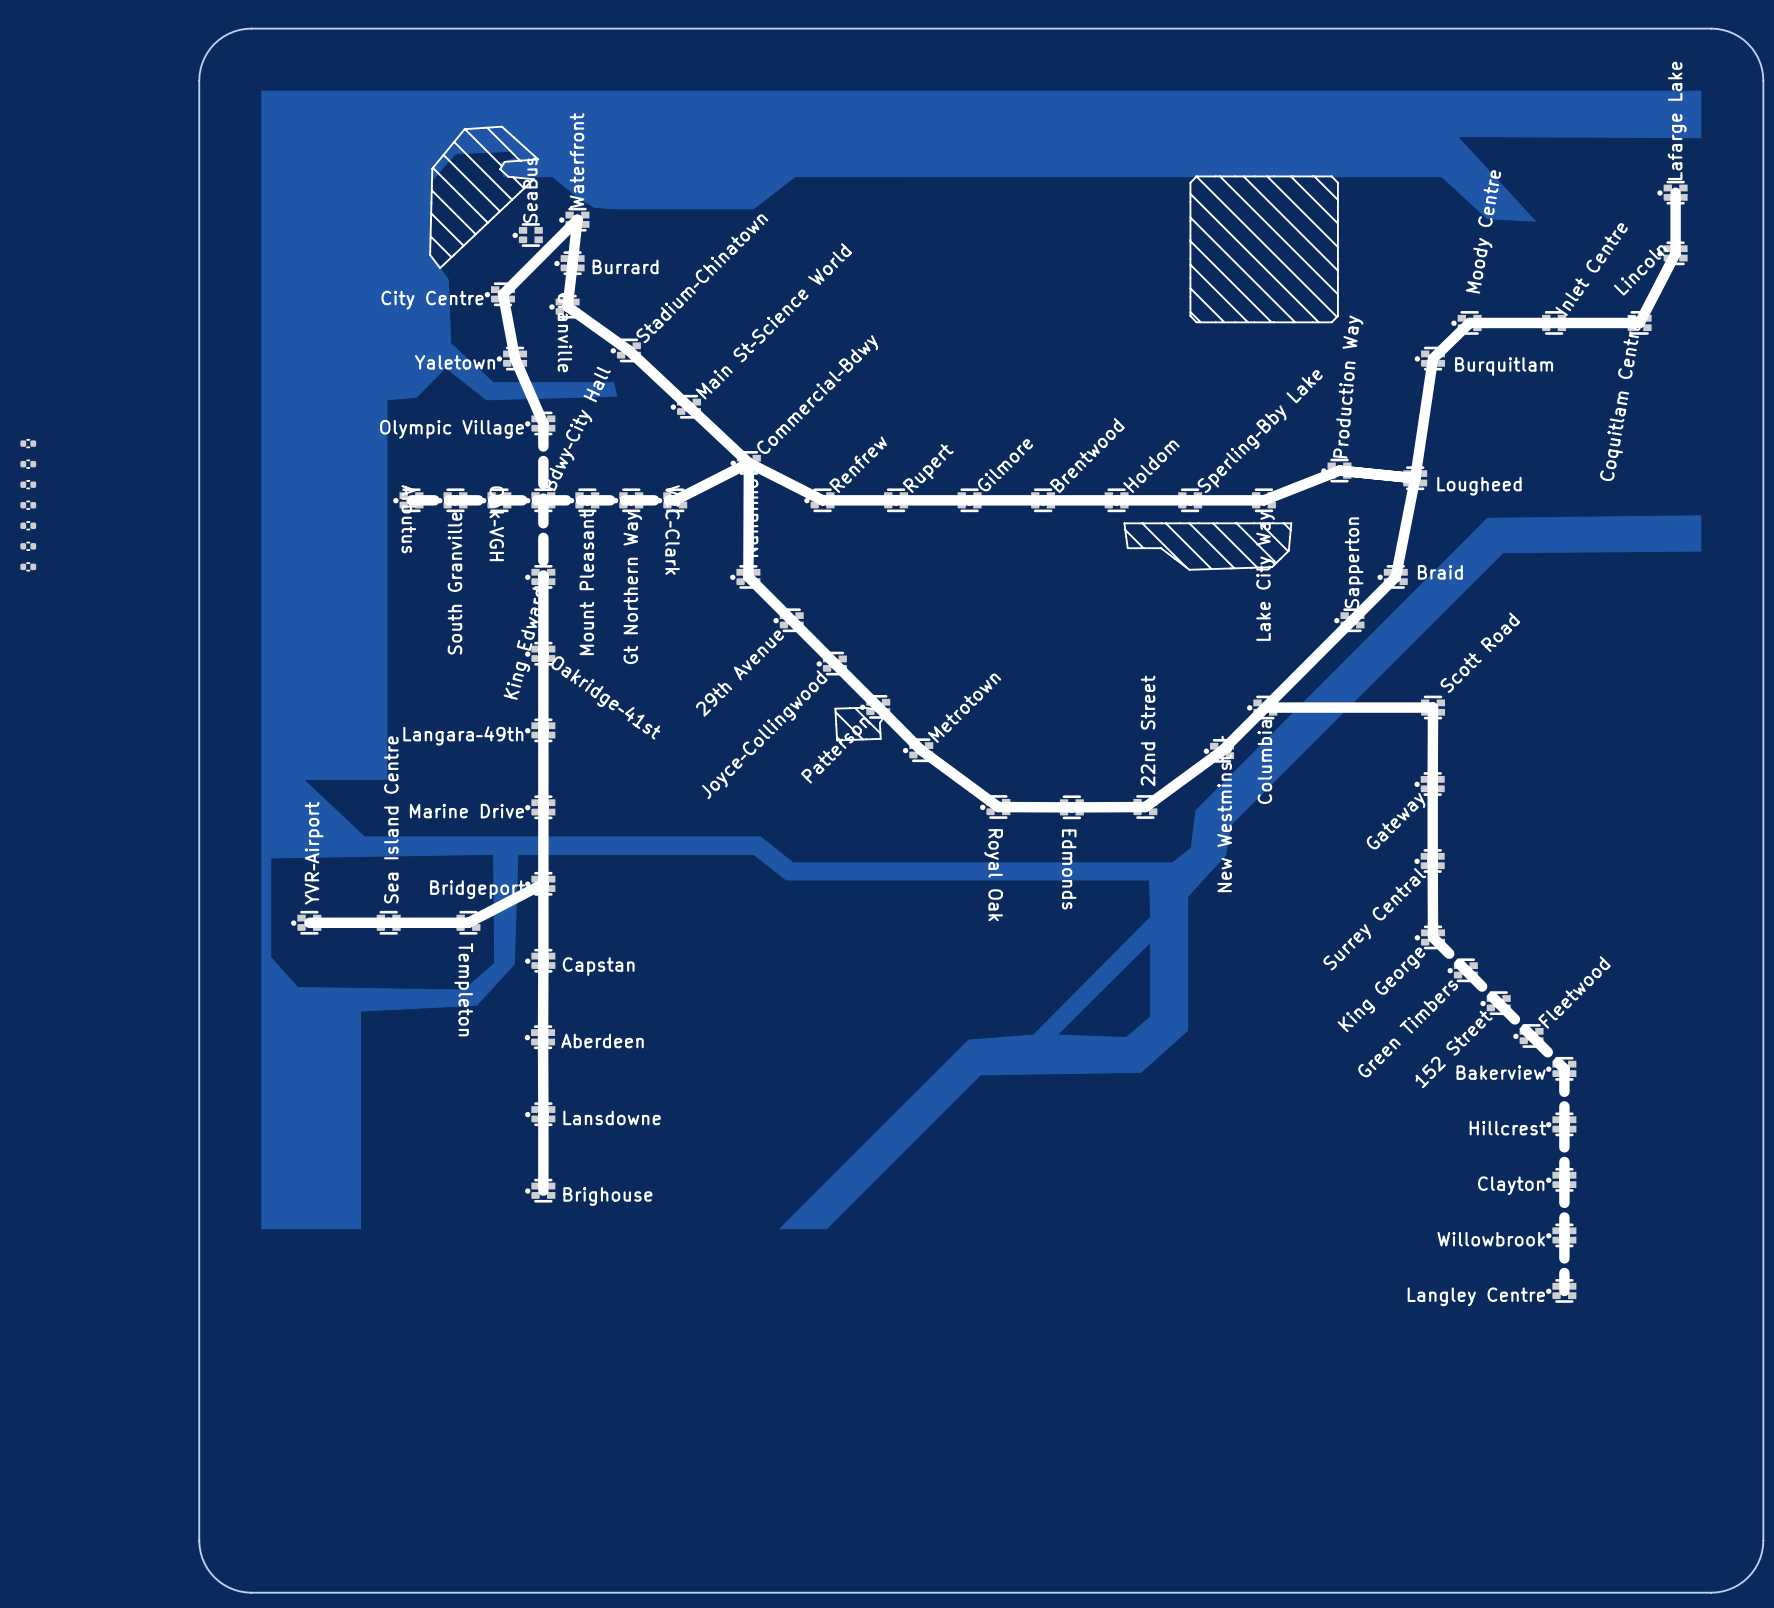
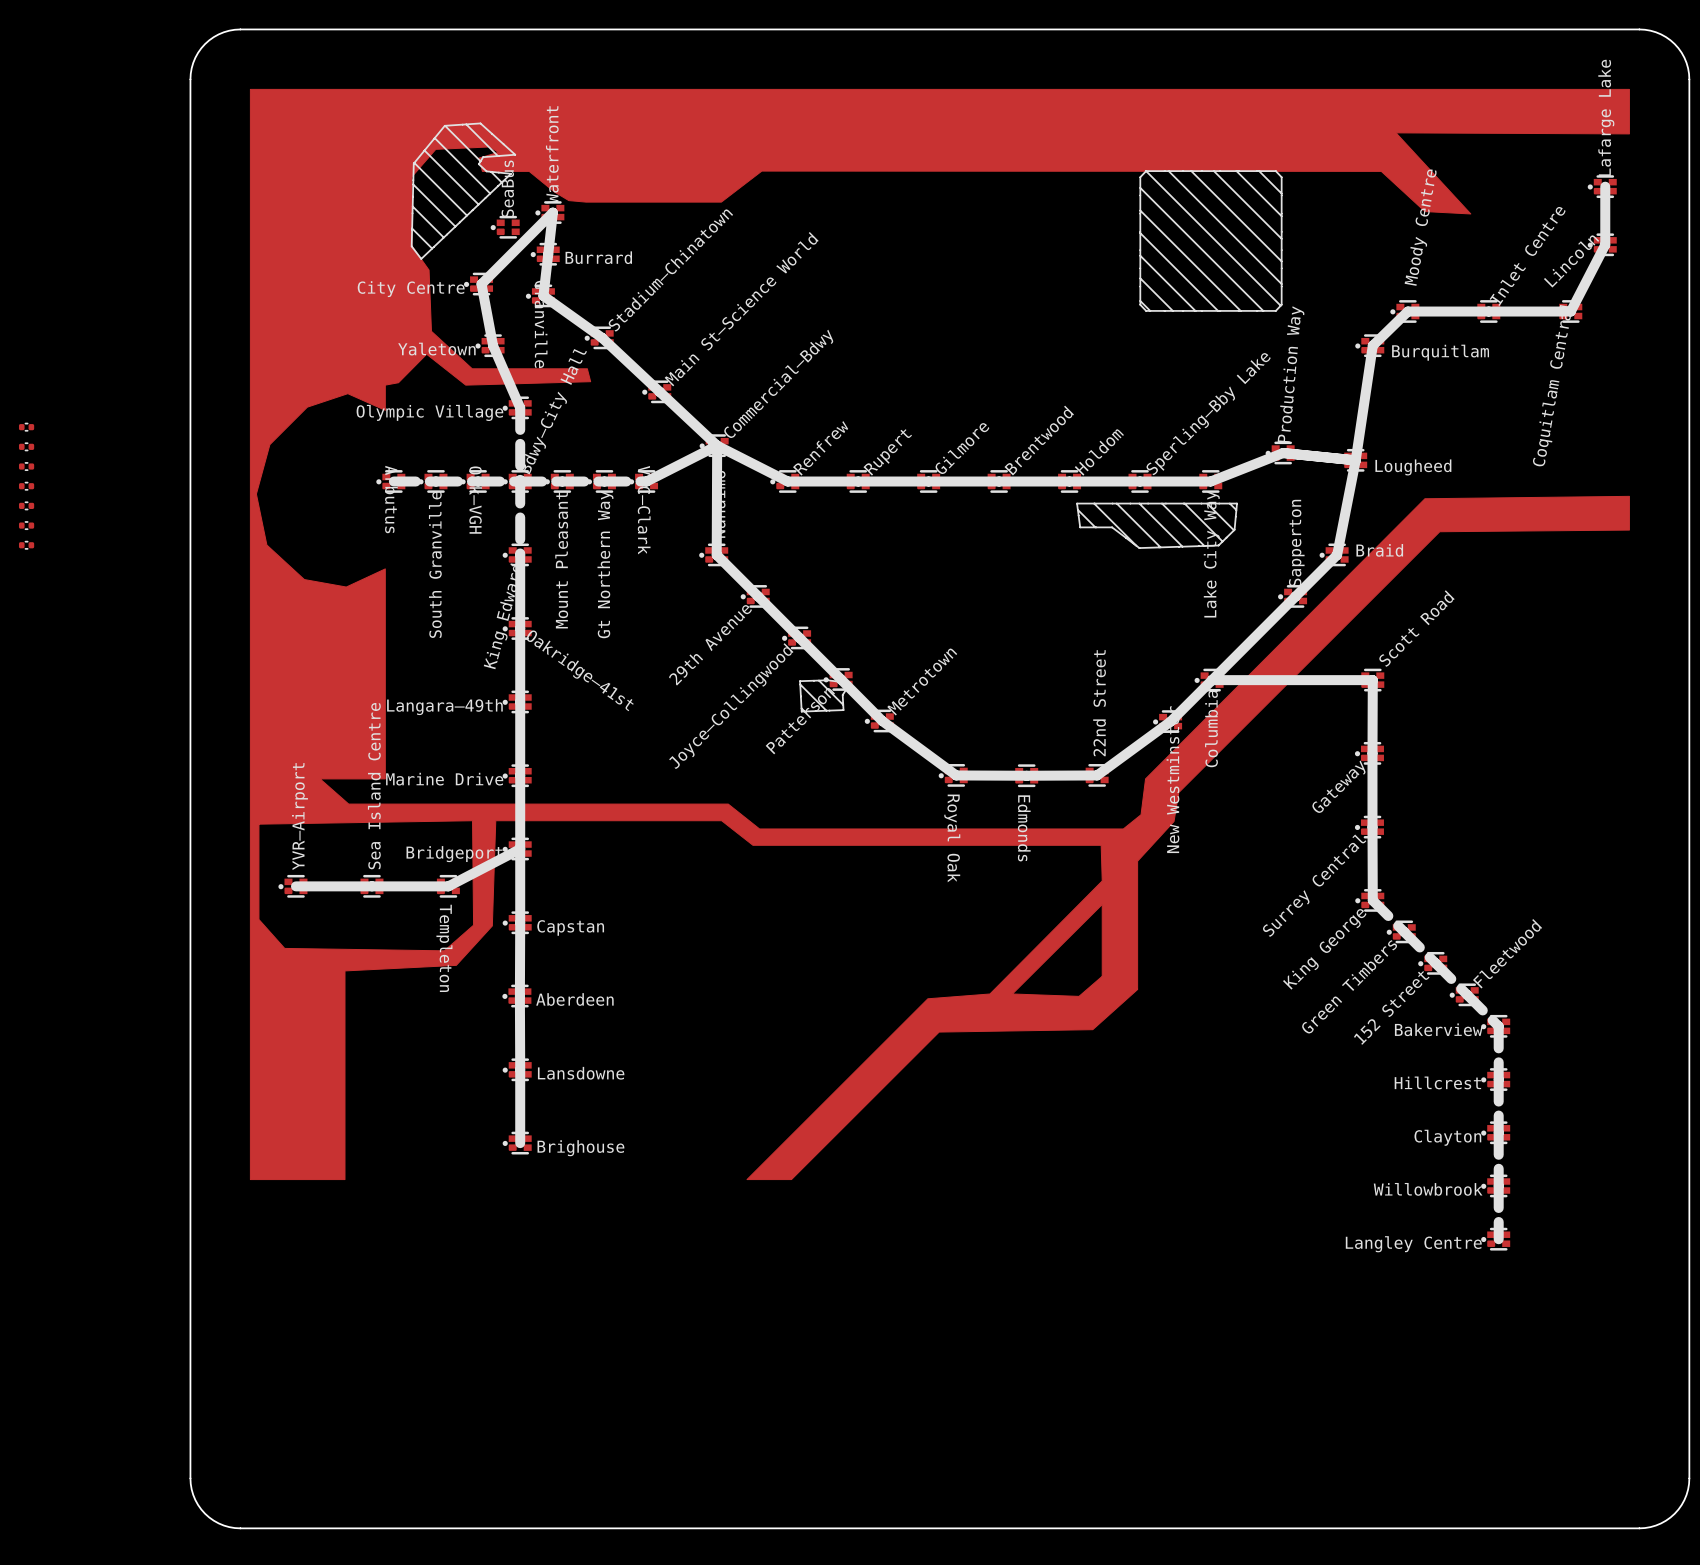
drawing shape: [261, 90, 1702, 1230] -> [249, 88, 1630, 1181]

